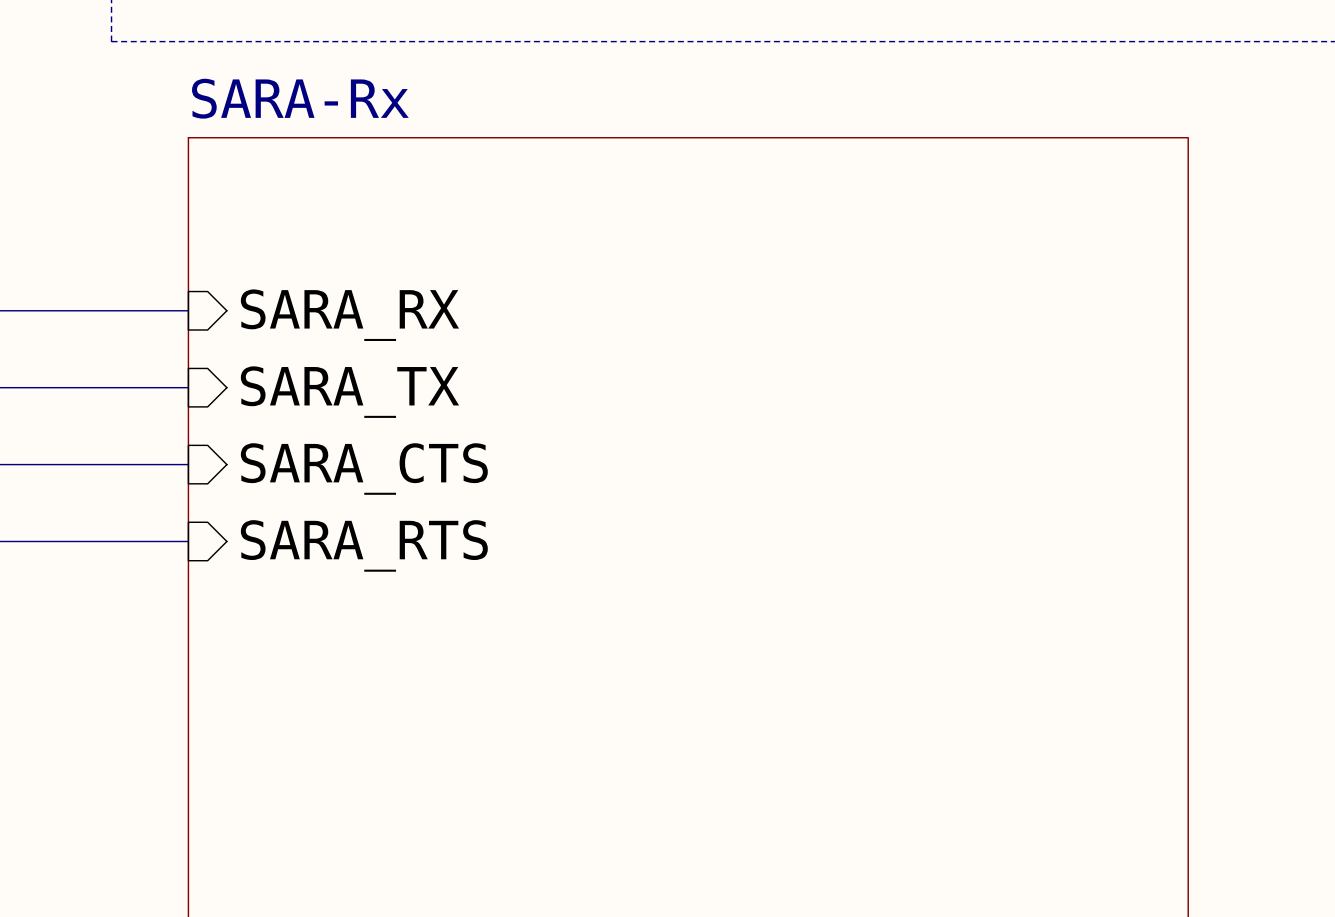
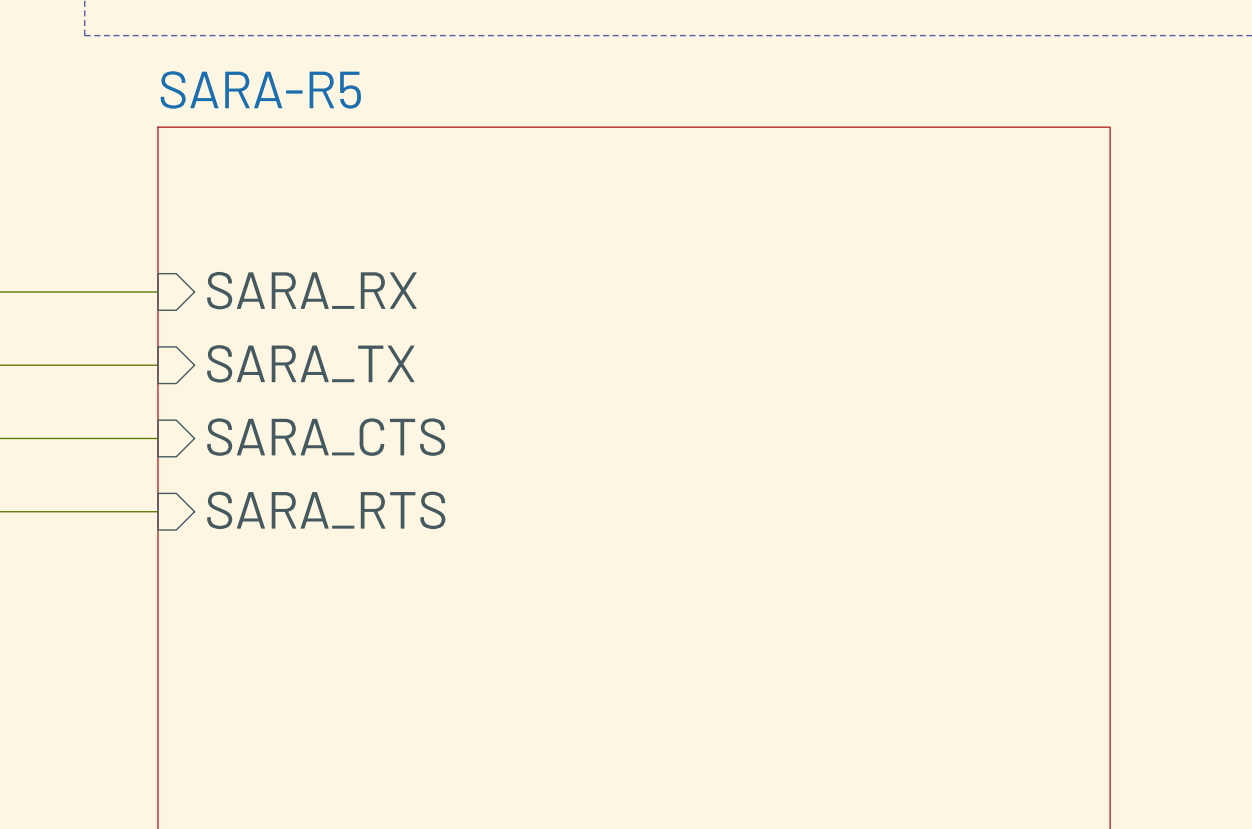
sheet SARA-Rx name: SARA-Rx (300, 98) -> SARA-R5 (260, 89)

